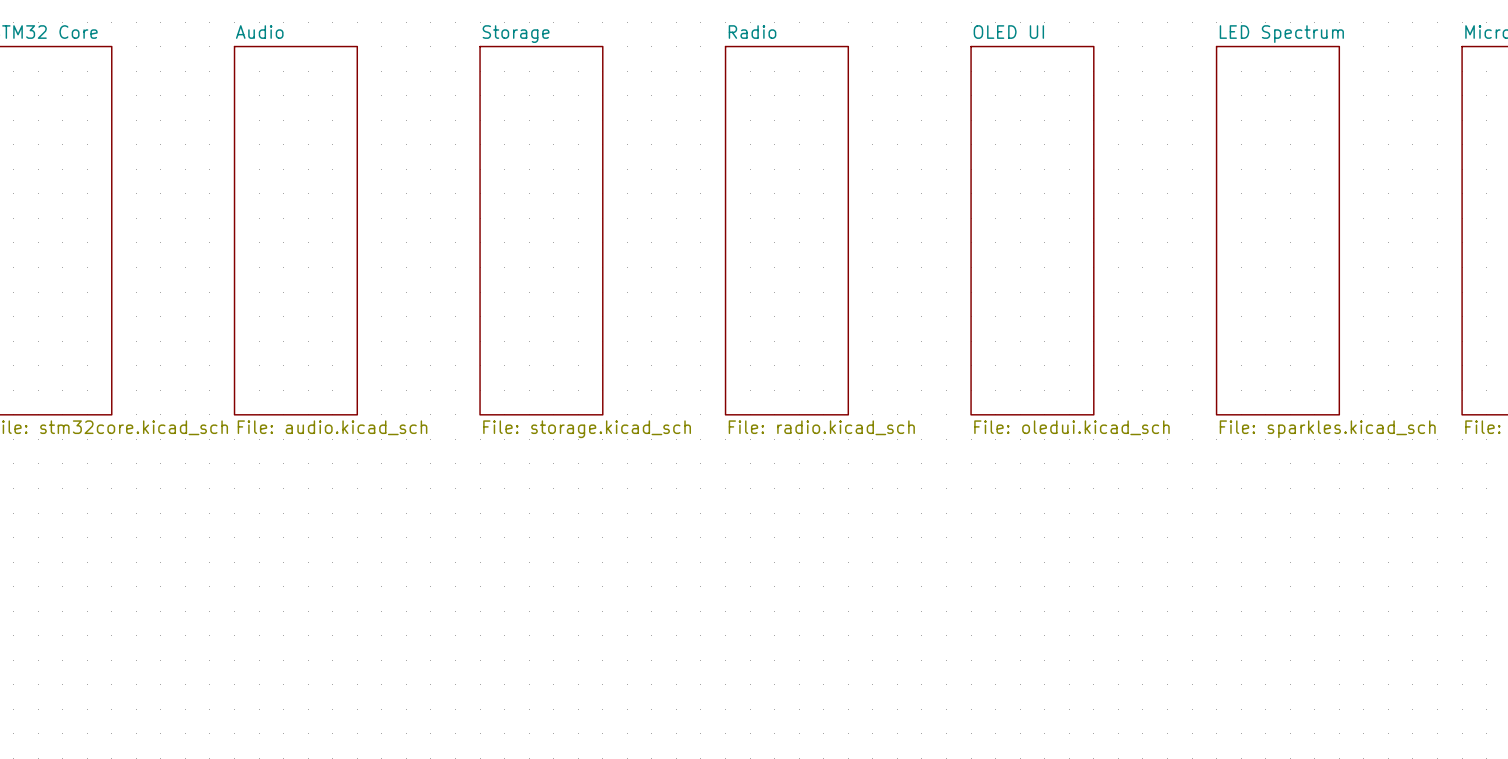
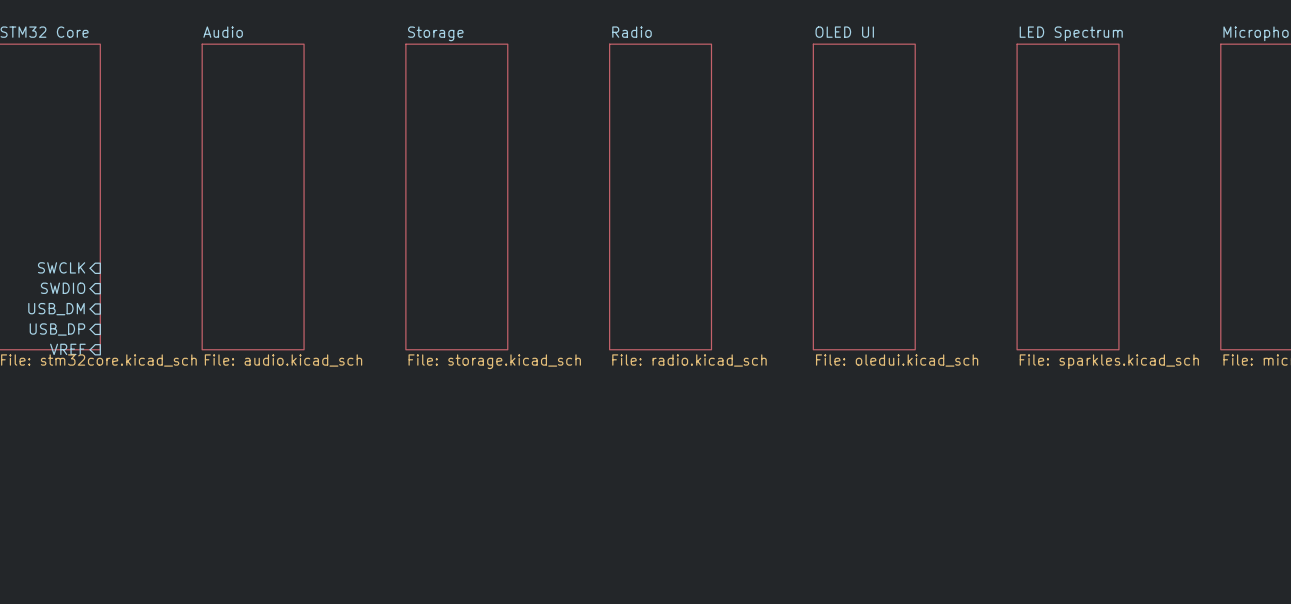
sheet pin: none -> SWCLK (61, 267)
sheet pin: none -> SWDIO (63, 288)
sheet pin: none -> USB_DM (56, 309)
sheet pin: none -> USB_DP (57, 329)
sheet pin: none -> VREF (67, 349)

